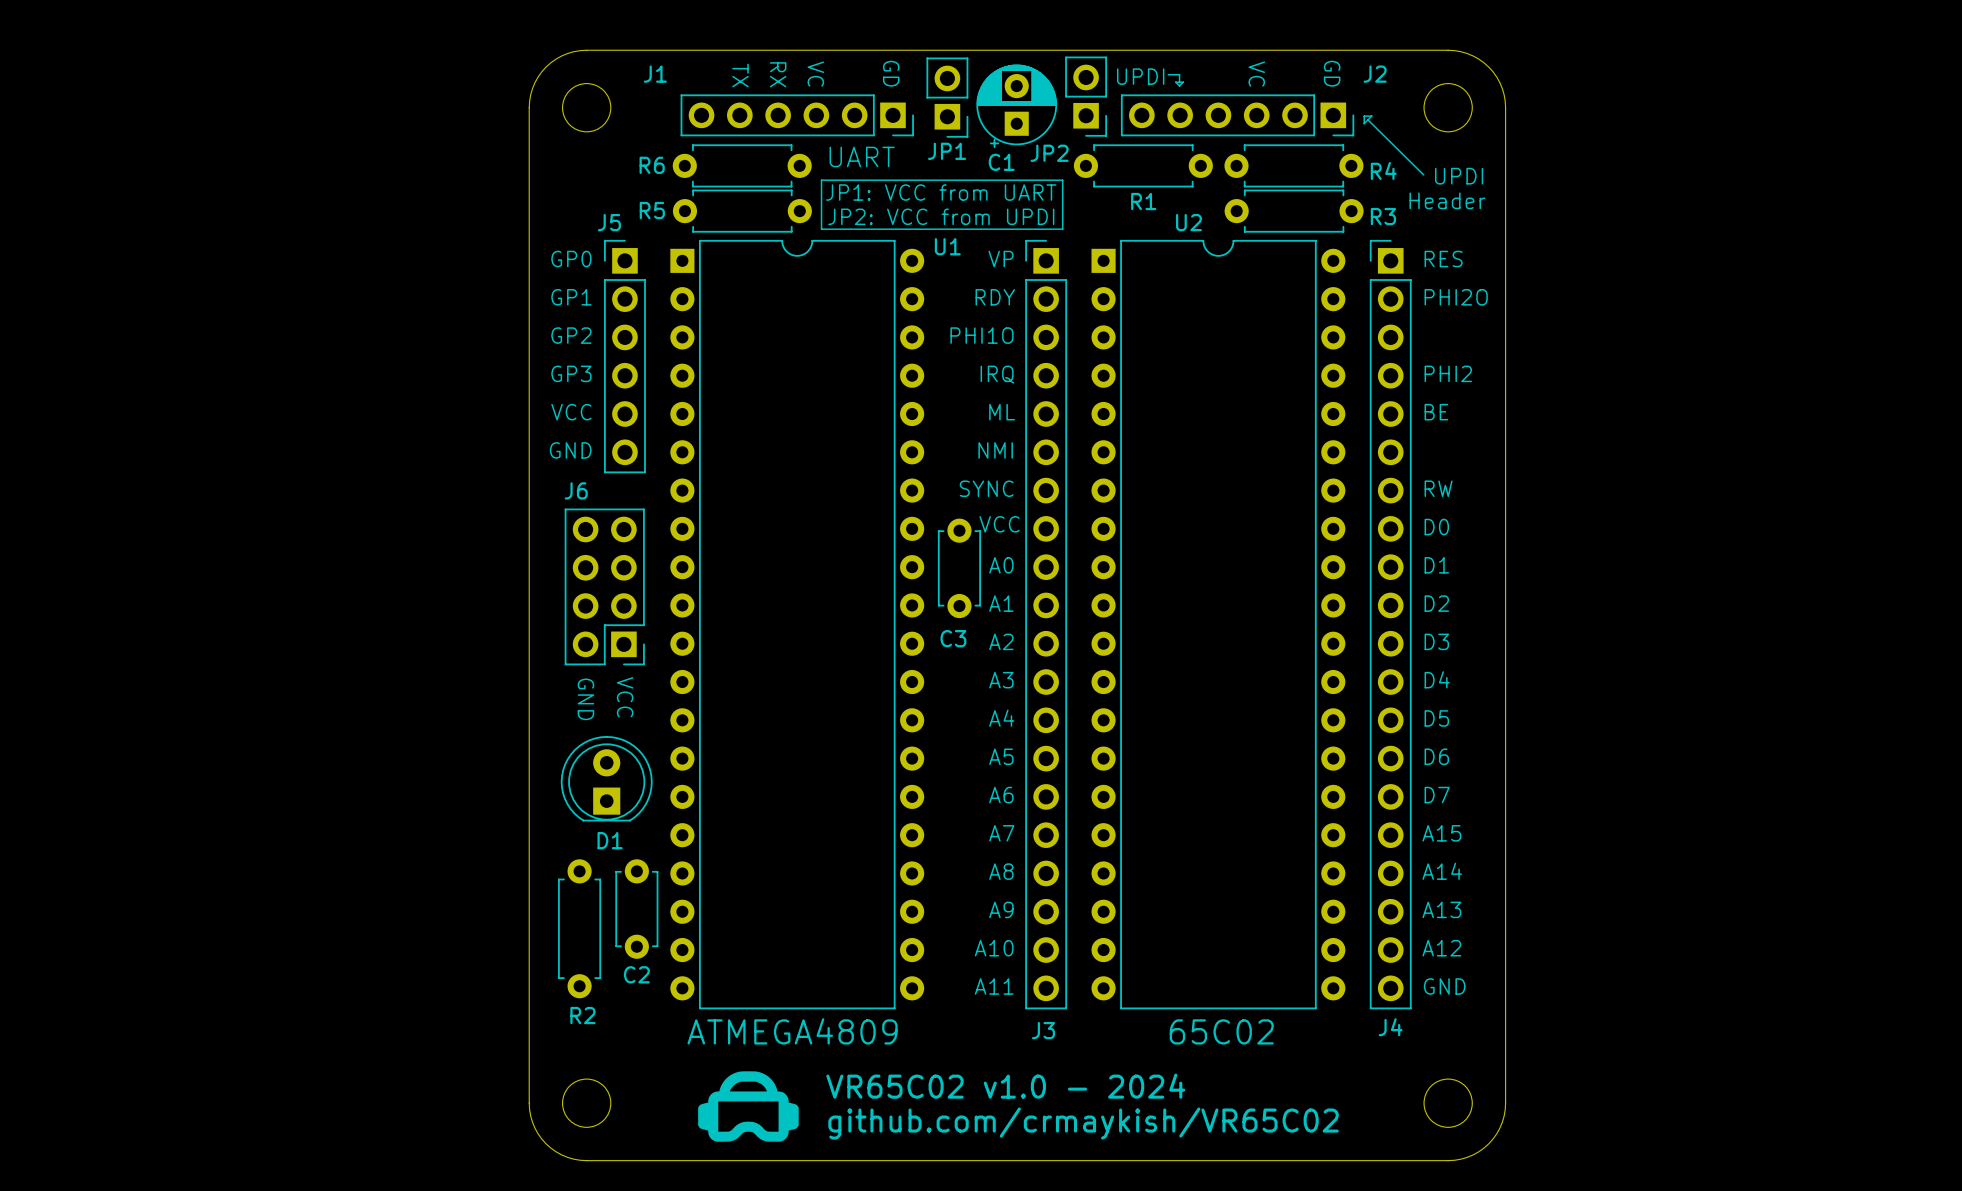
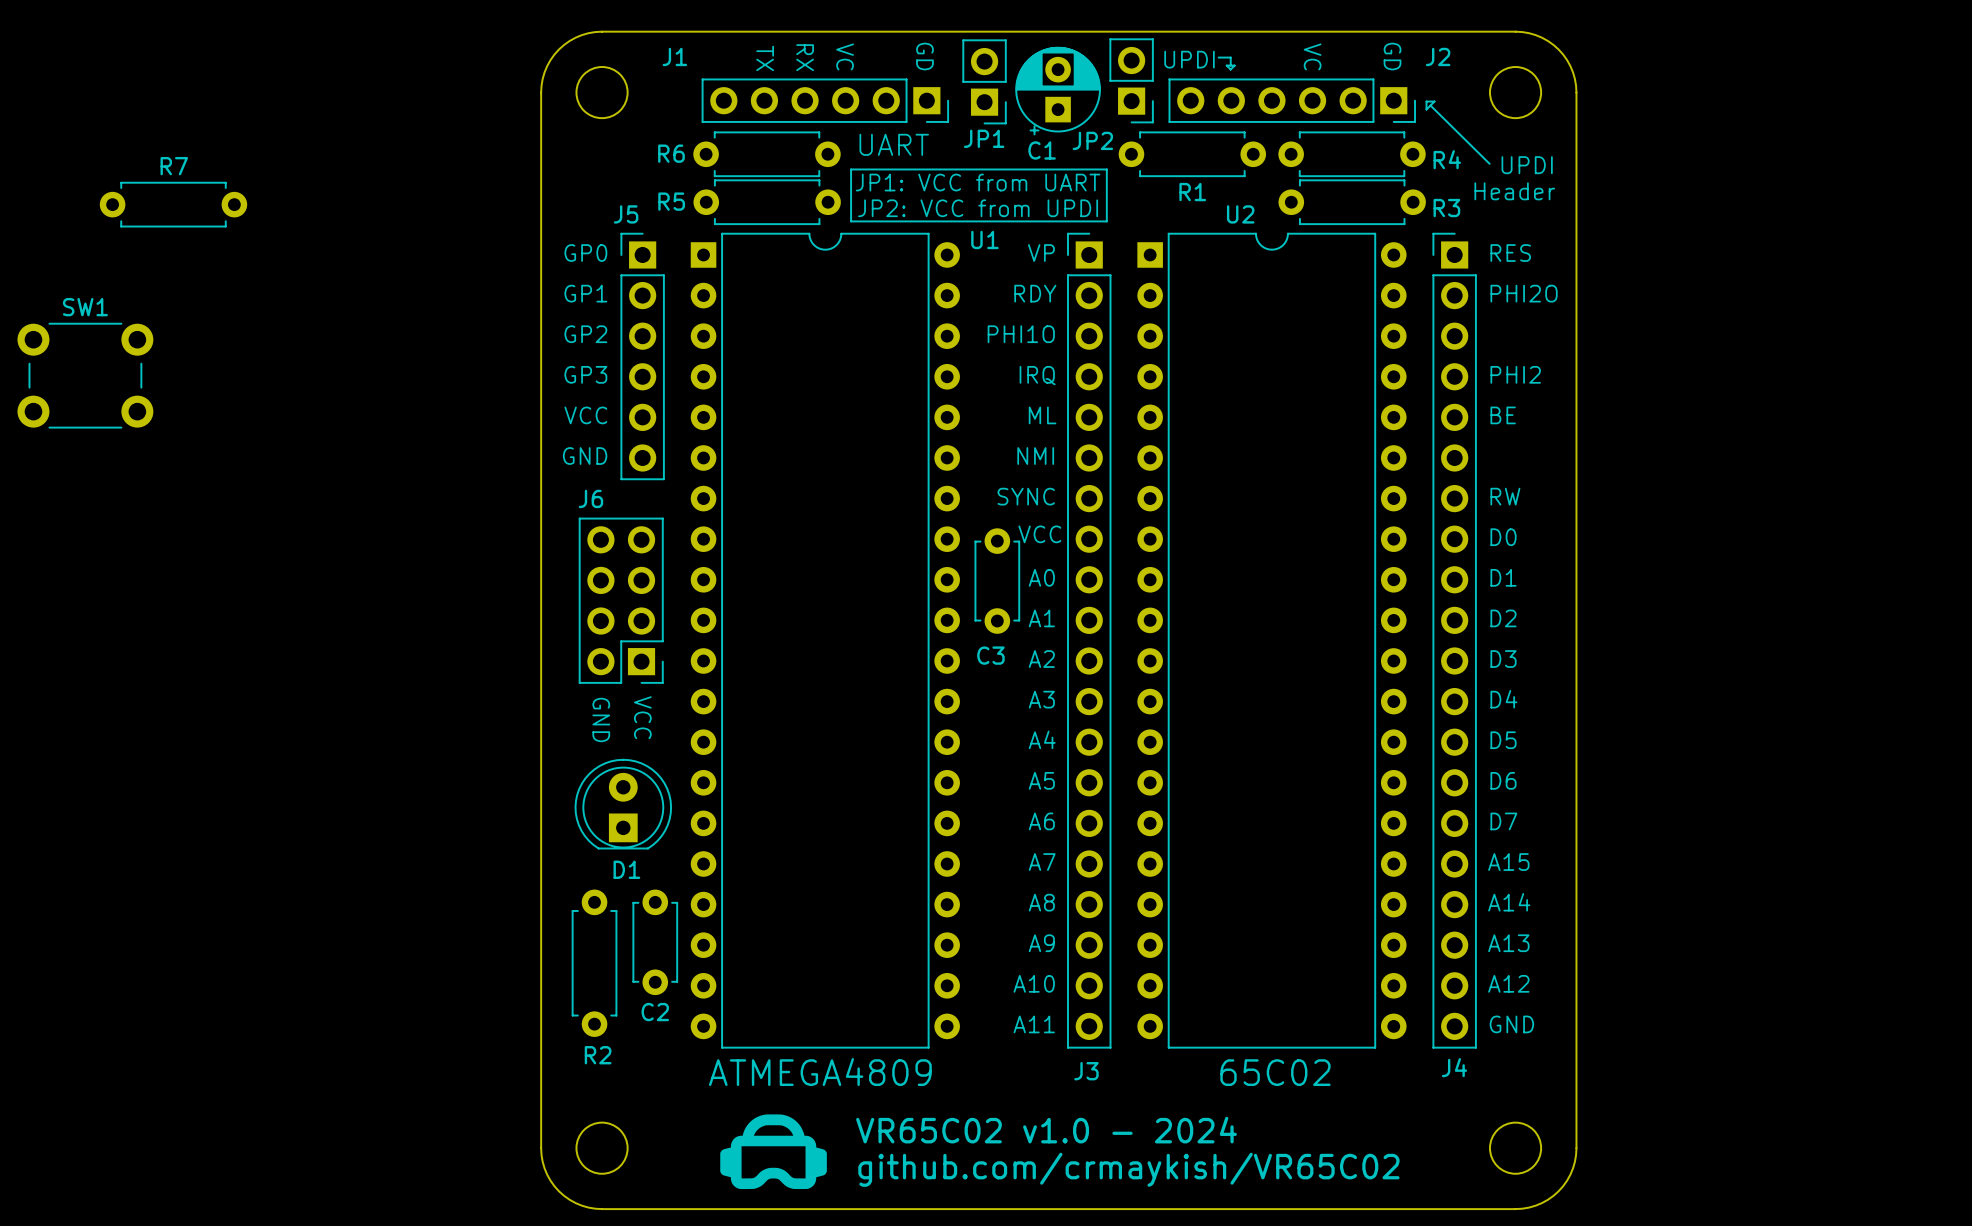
R7: none -> (173, 204)
SW1: none -> (85, 375)

